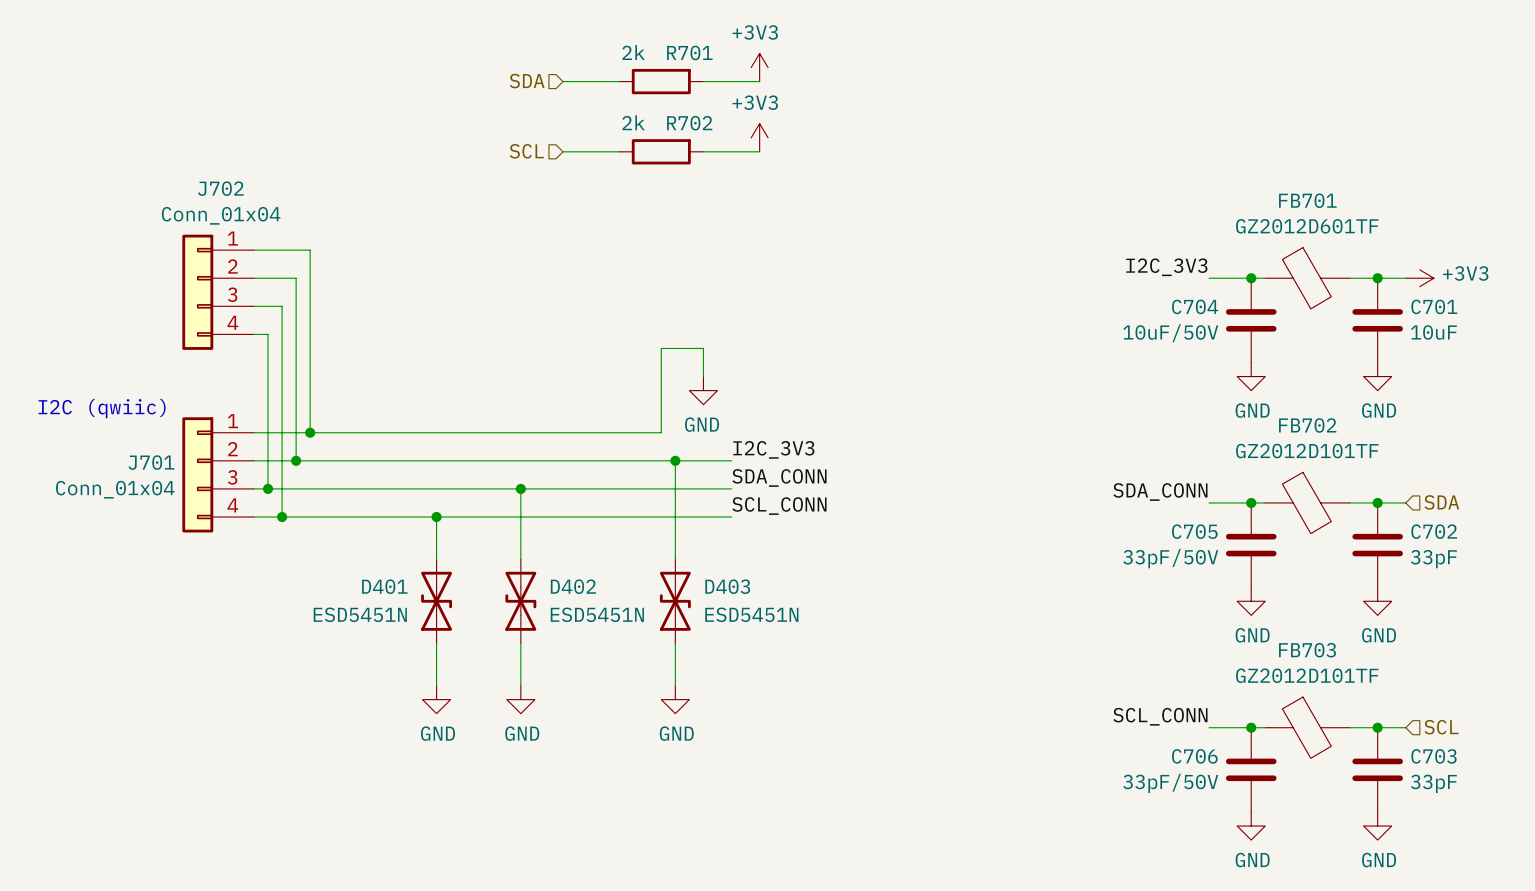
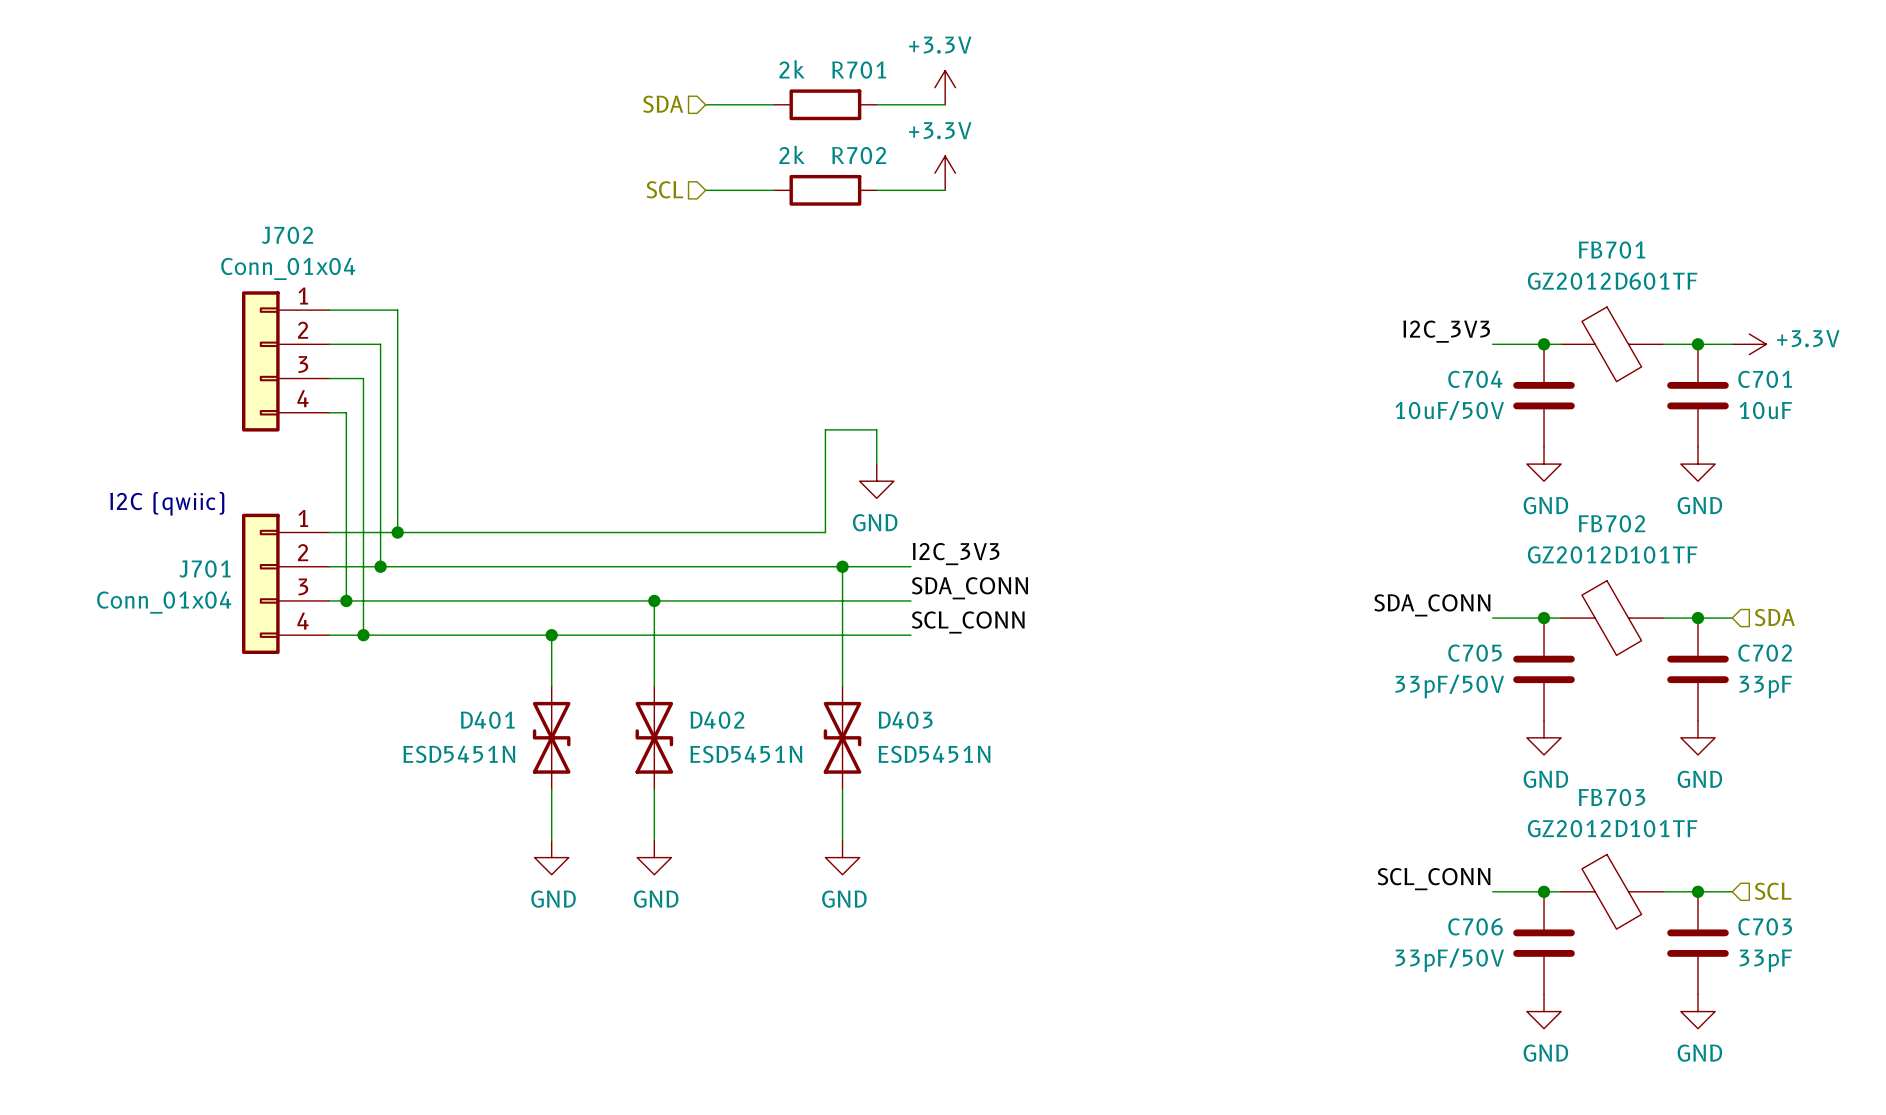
power symbol: +3V3 (759, 67) -> +3.3V (945, 87)
power symbol: +3V3 (759, 137) -> +3.3V (945, 173)
power symbol: +3V3 (1419, 278) -> +3.3V (1749, 344)

